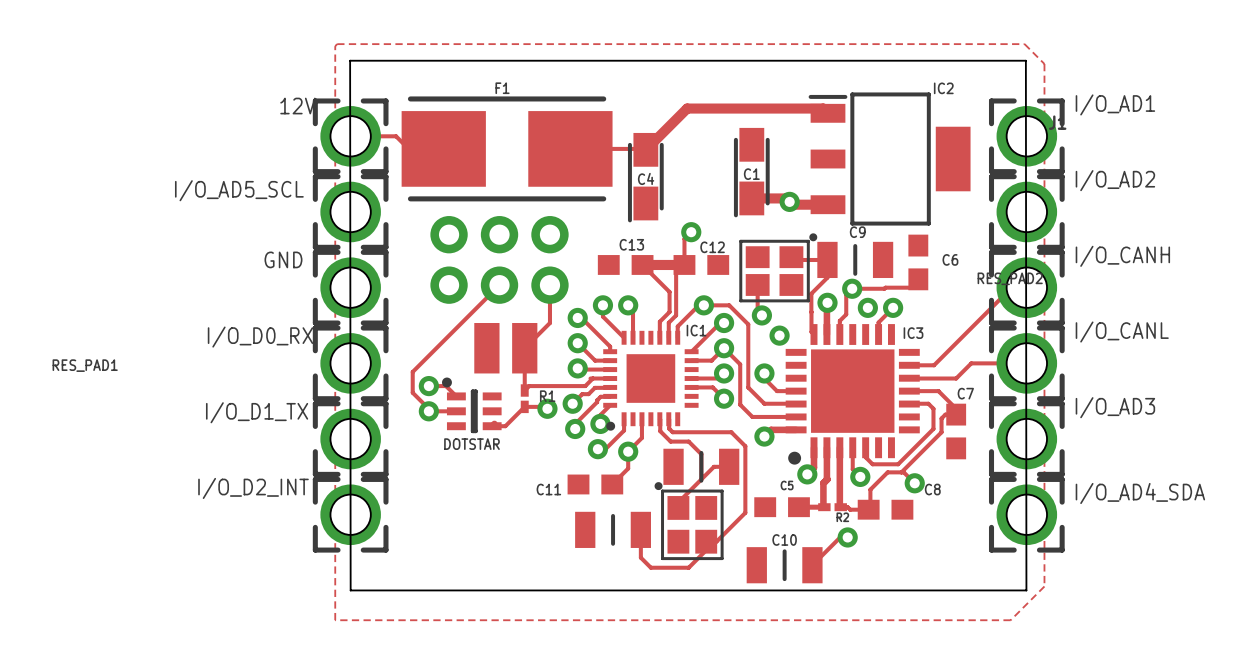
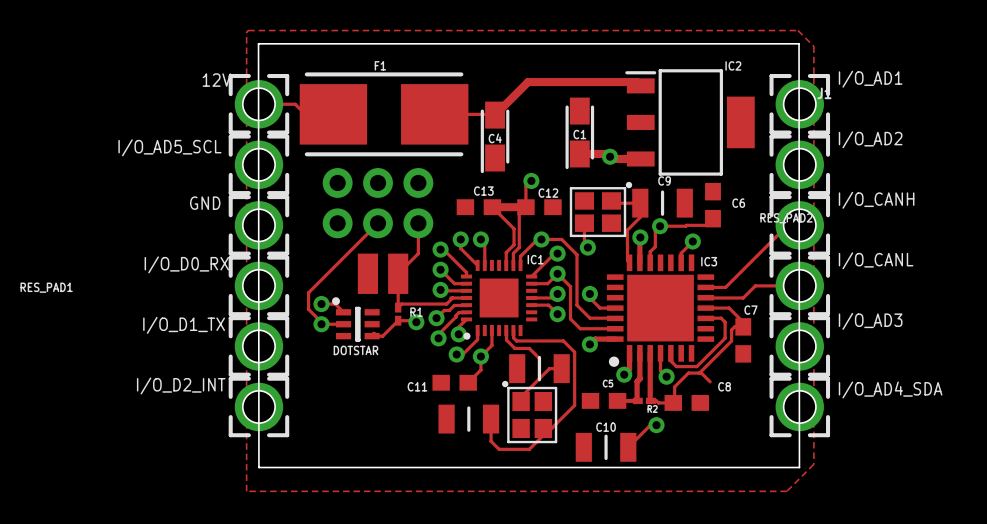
via: (867, 307) -> none
via: (779, 335) -> none
via: (914, 483) -> none

